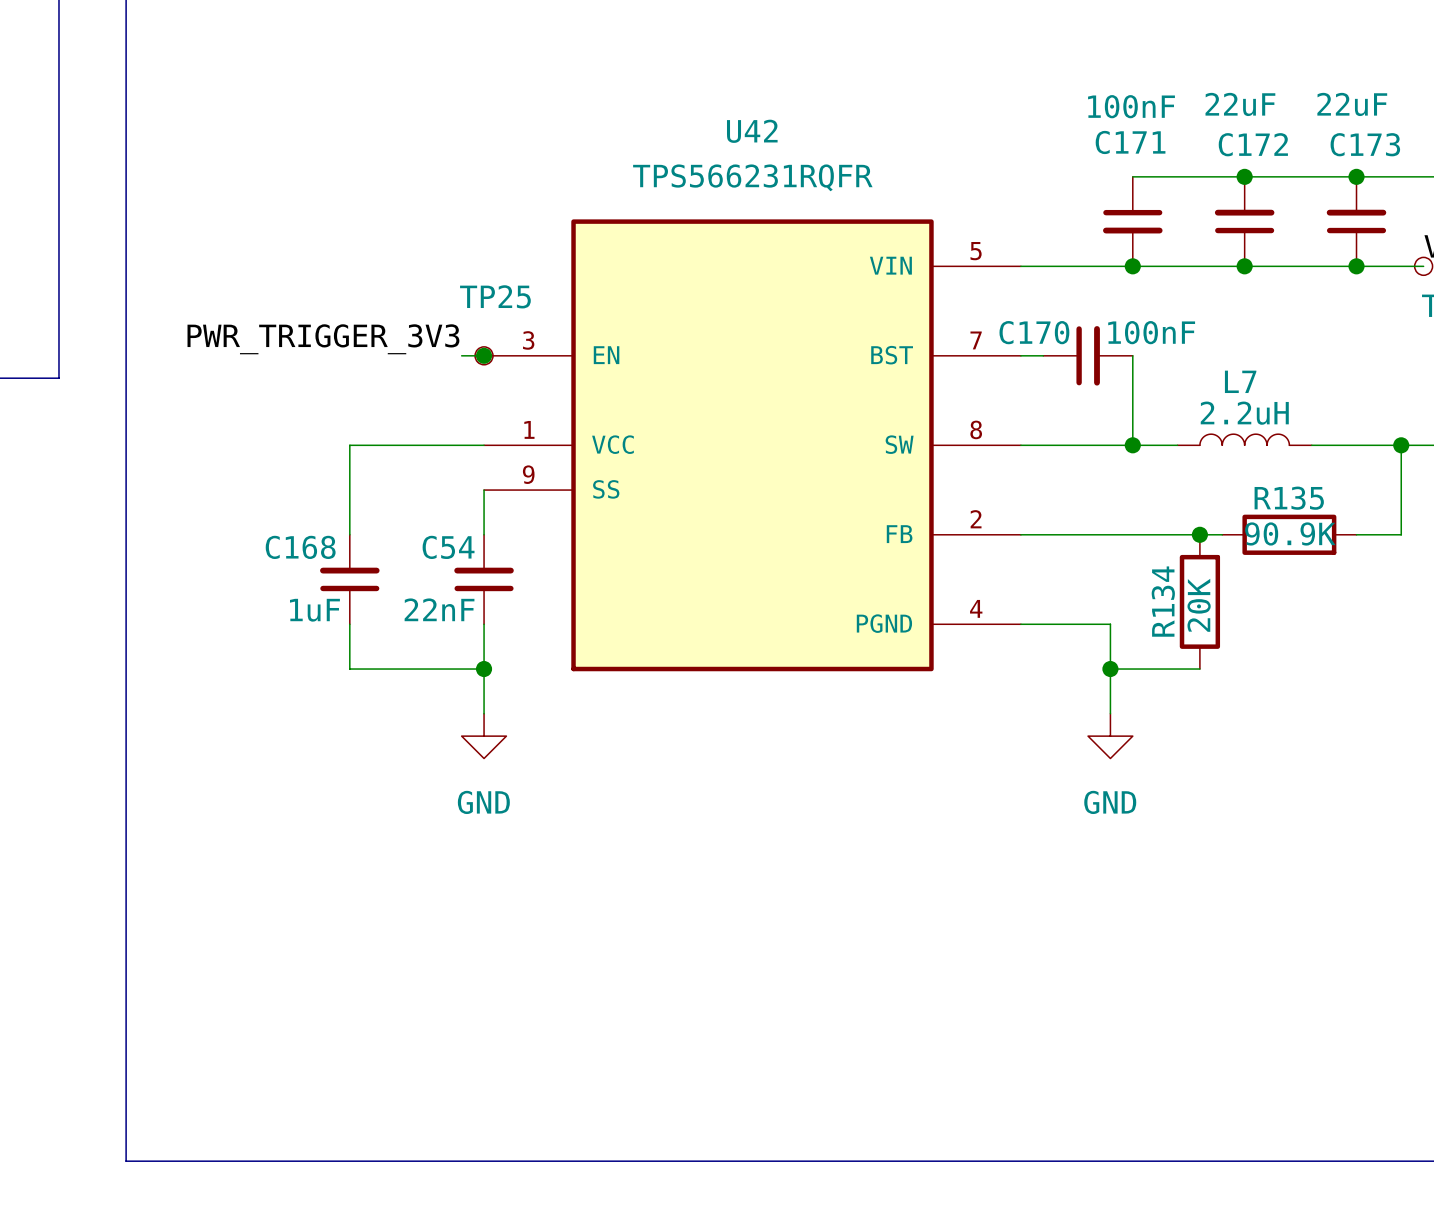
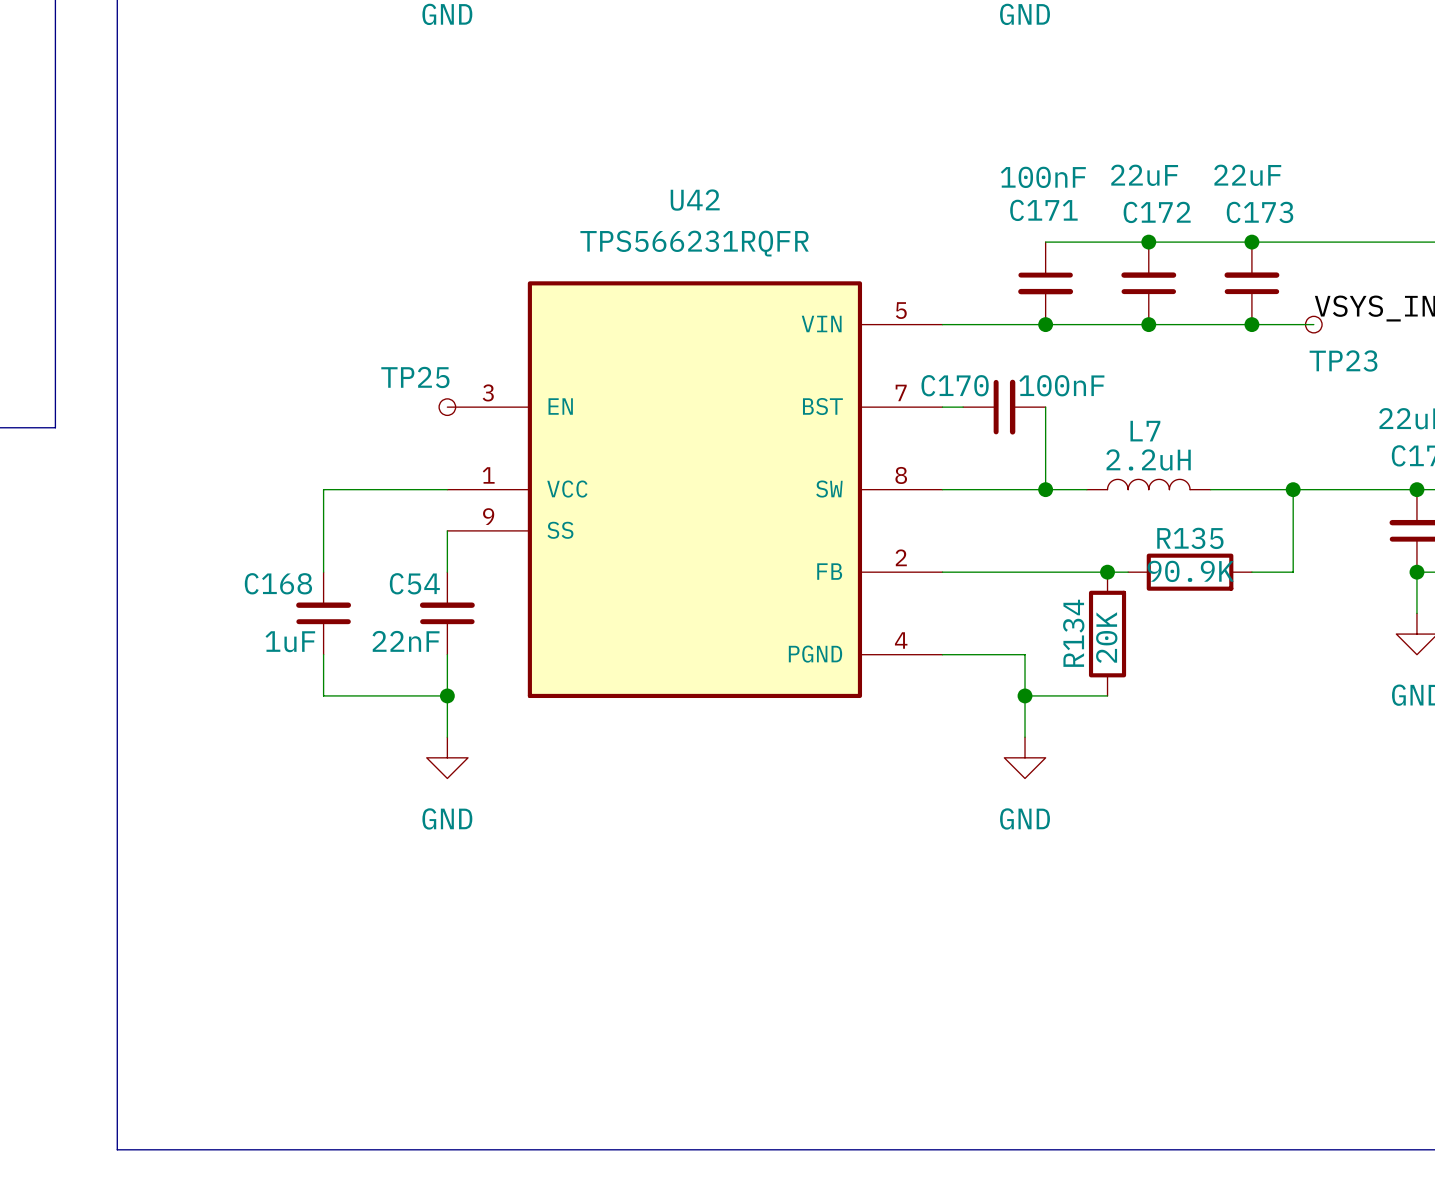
TP25 name position: TP25 (495, 296) -> TP25 (415, 377)
label: PWR_TRIGGER_3V3 (323, 339) -> none
wire: (461, 355) (484, 355) -> none
junction: (484, 355) -> none

